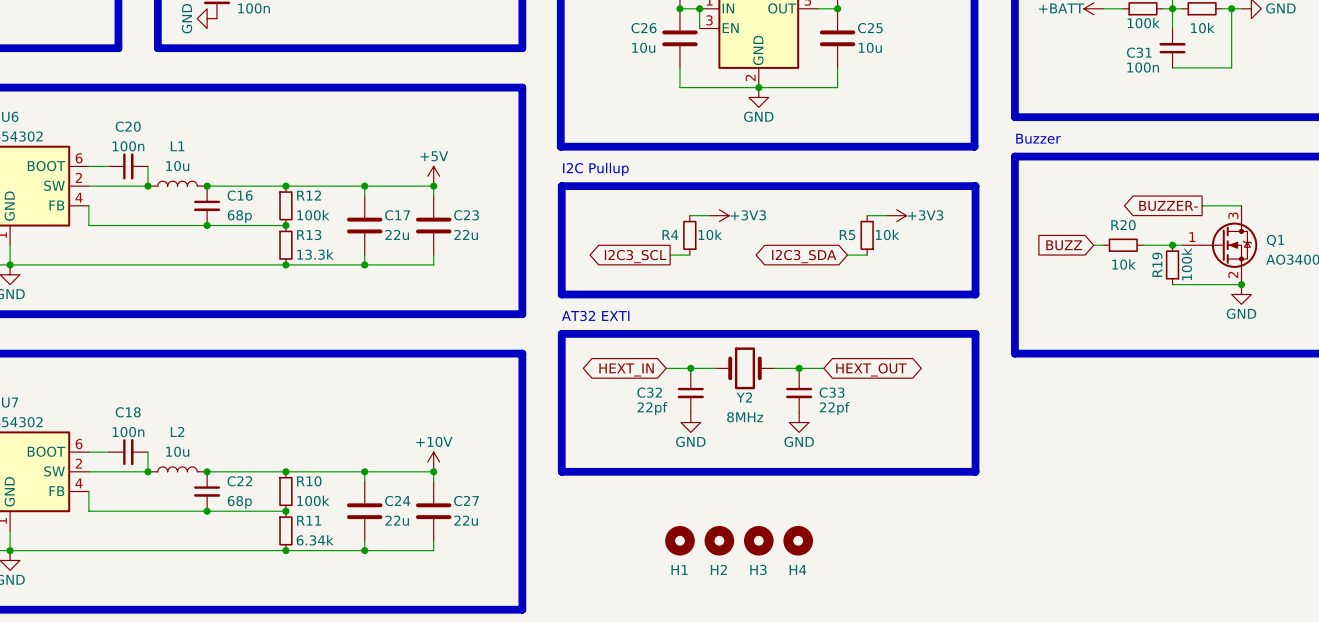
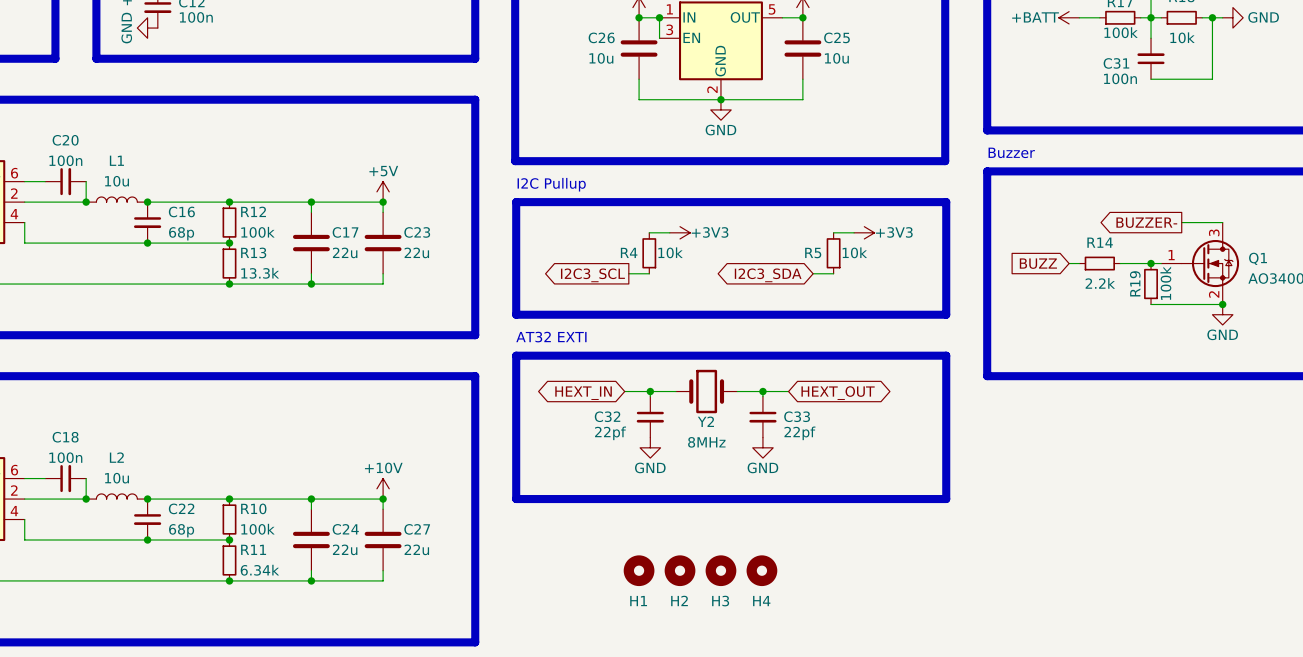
R20 name: R20 (1123, 225) -> R14 (1100, 242)
R20 value: 10k (1124, 264) -> 2.2k (1100, 283)

